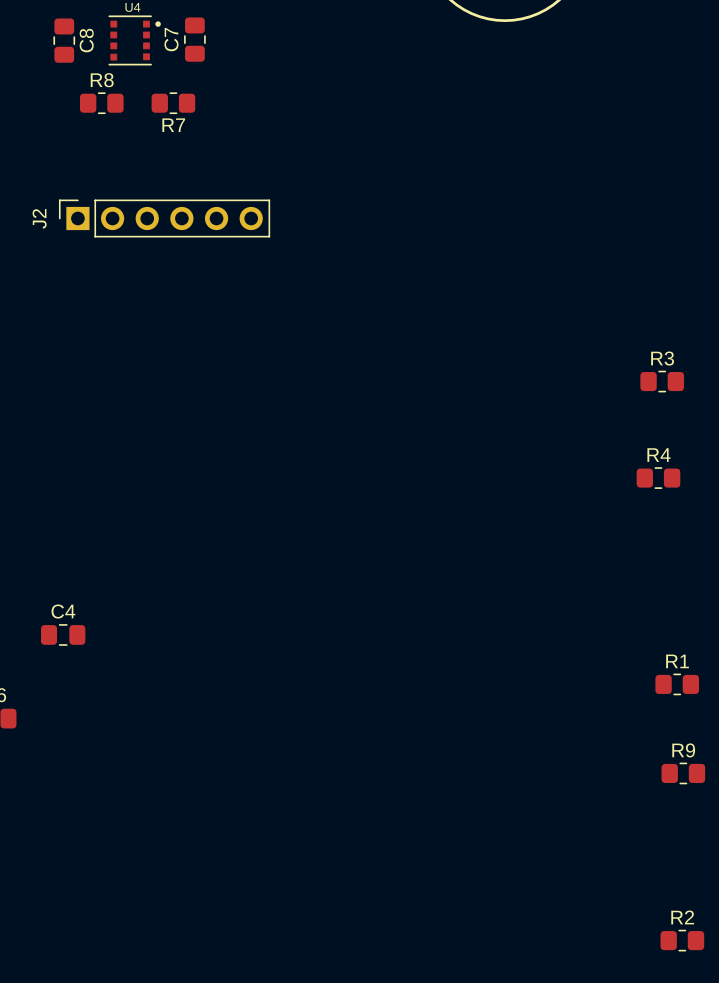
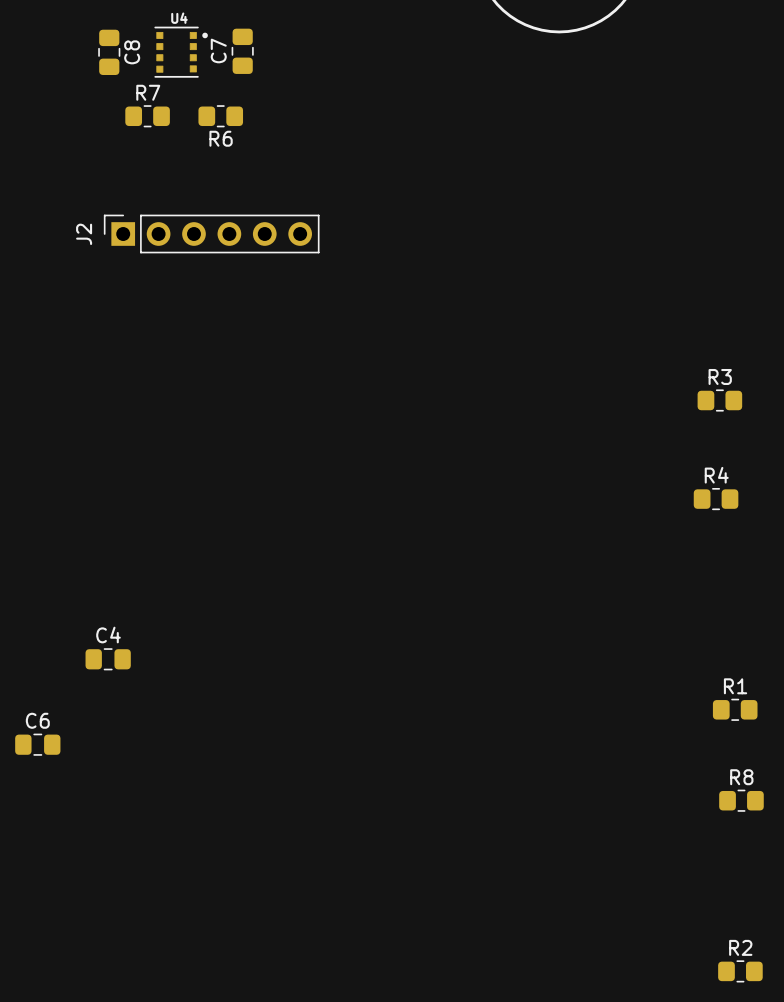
R8 name: R8 (102, 80) -> R7 (148, 92)
R7 name: R7 (173, 125) -> R6 (221, 138)
R9 name: R9 (683, 750) -> R8 (741, 777)

